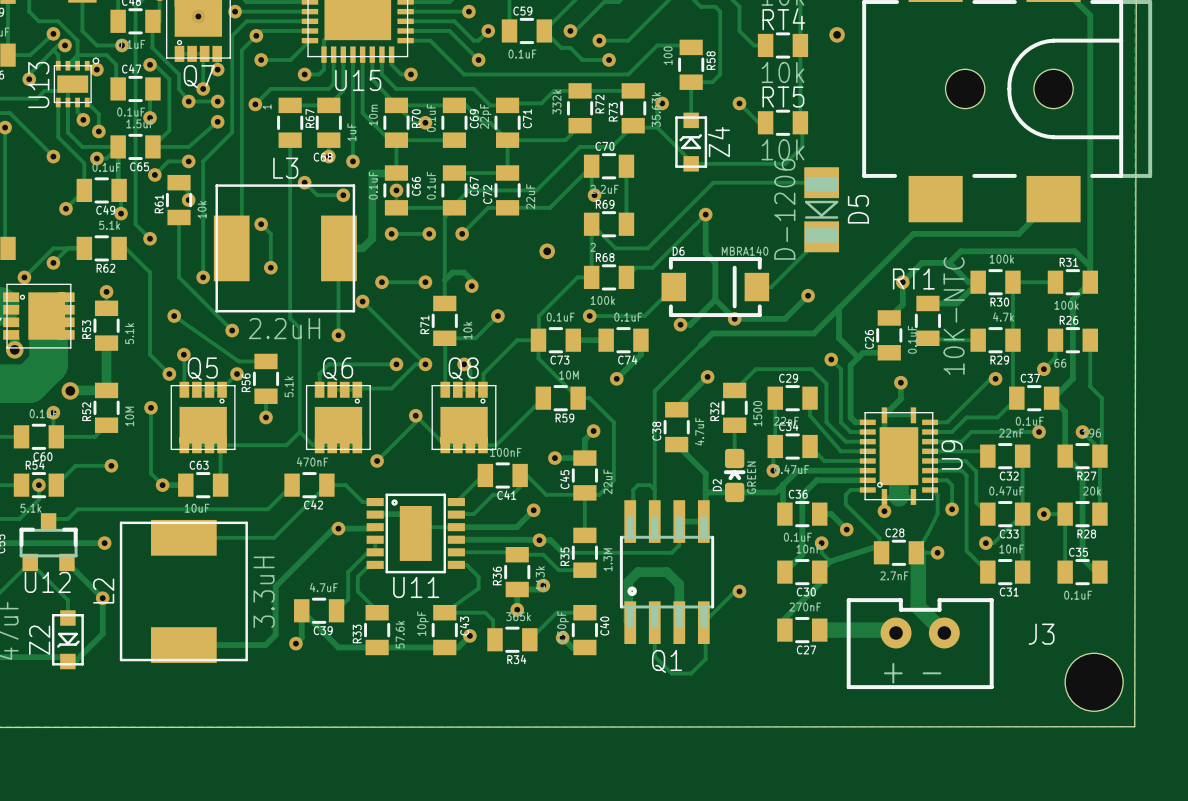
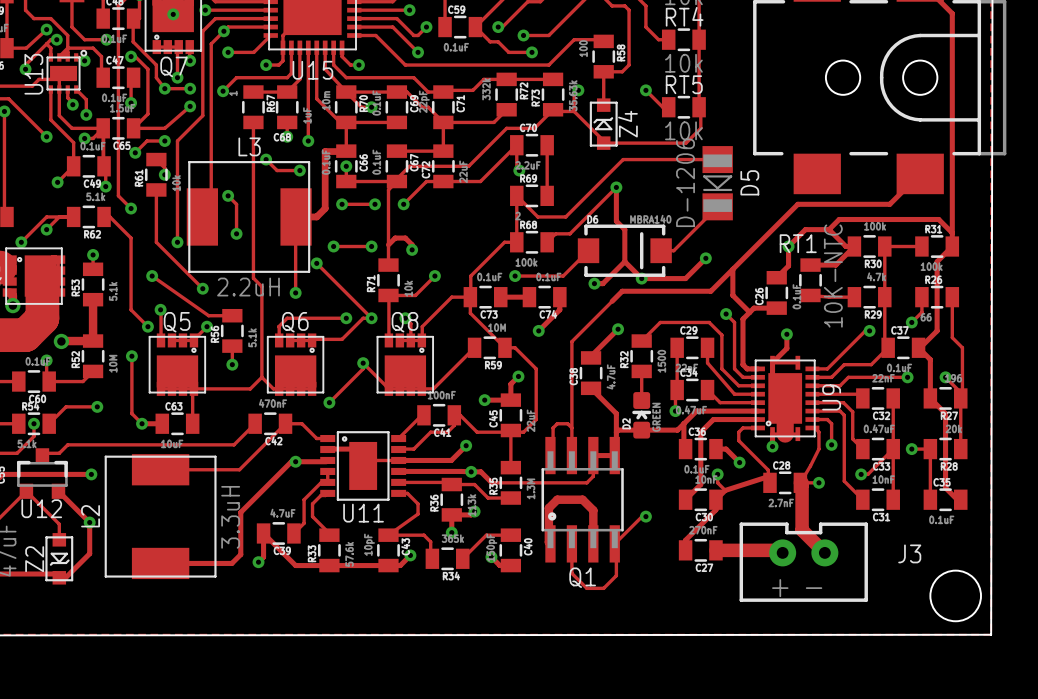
via: (837, 34) -> none
via: (547, 251) -> none

